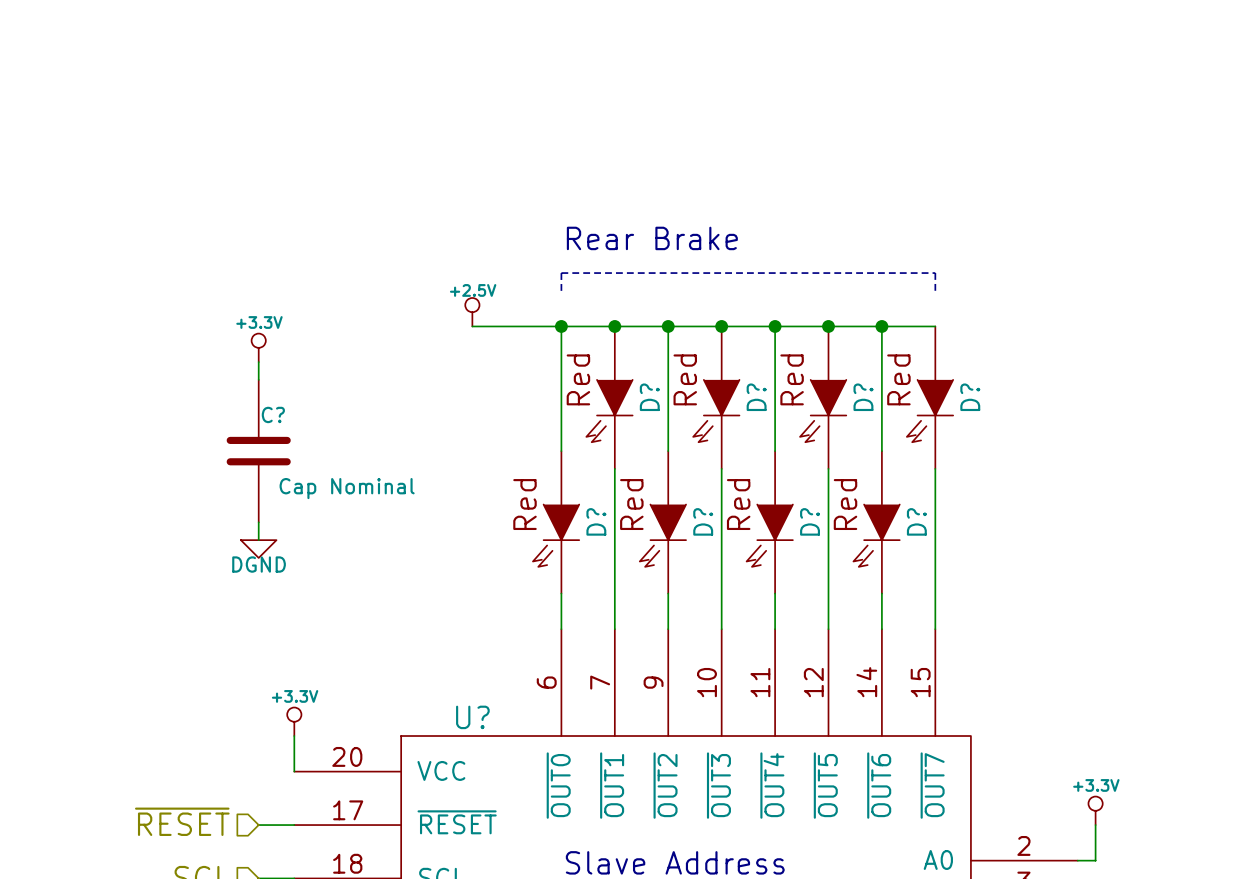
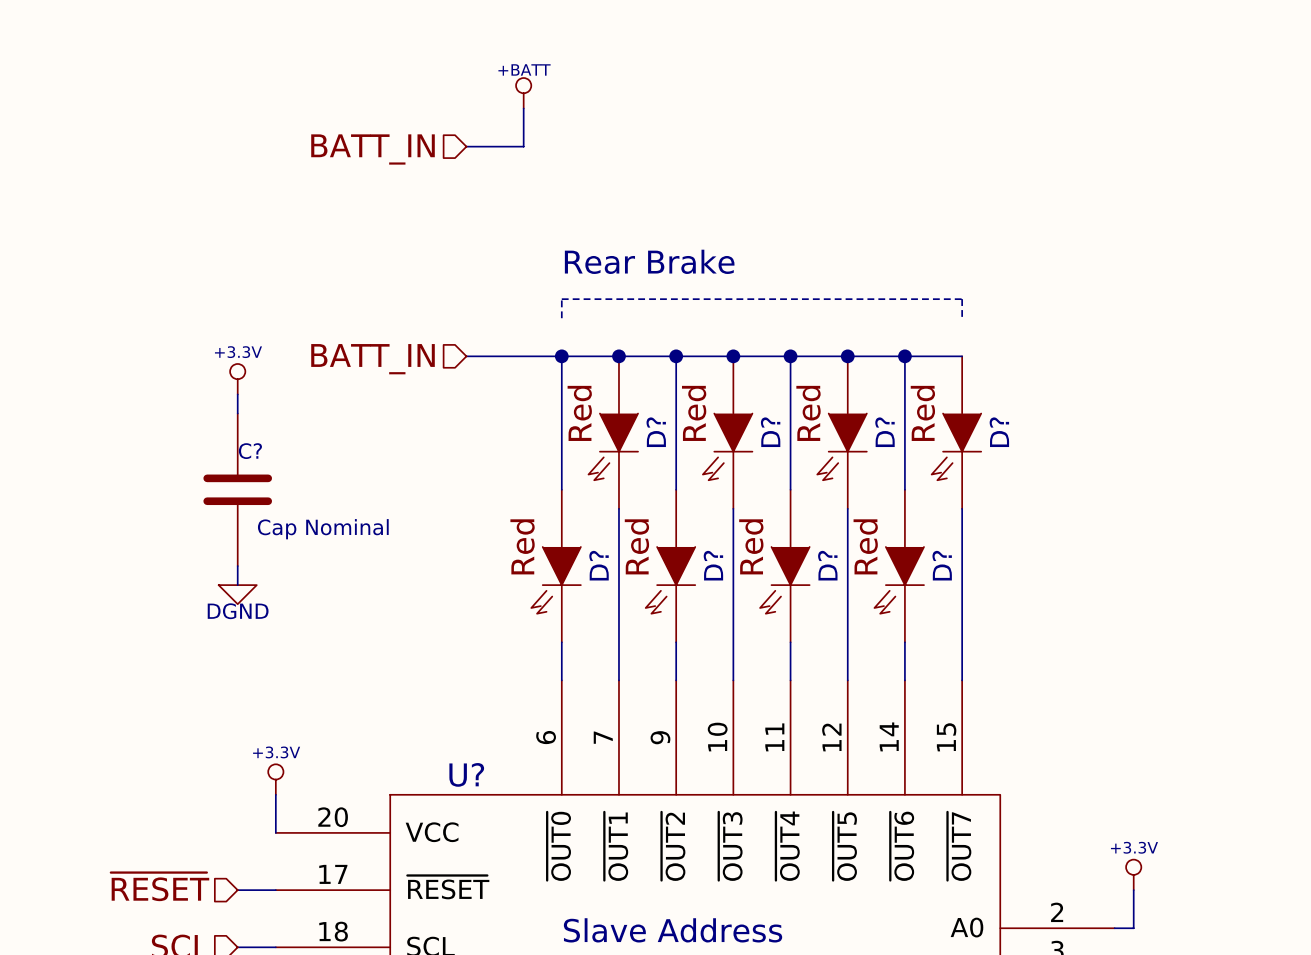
power symbol: none -> +BATT (523, 93)
wire: none -> (523, 108) (523, 146) (466, 146)
hierarchical label: none -> BATT_IN (373, 149)
power symbol: +2.5V (472, 312) -> none
hierarchical label: none -> BATT_IN (373, 359)

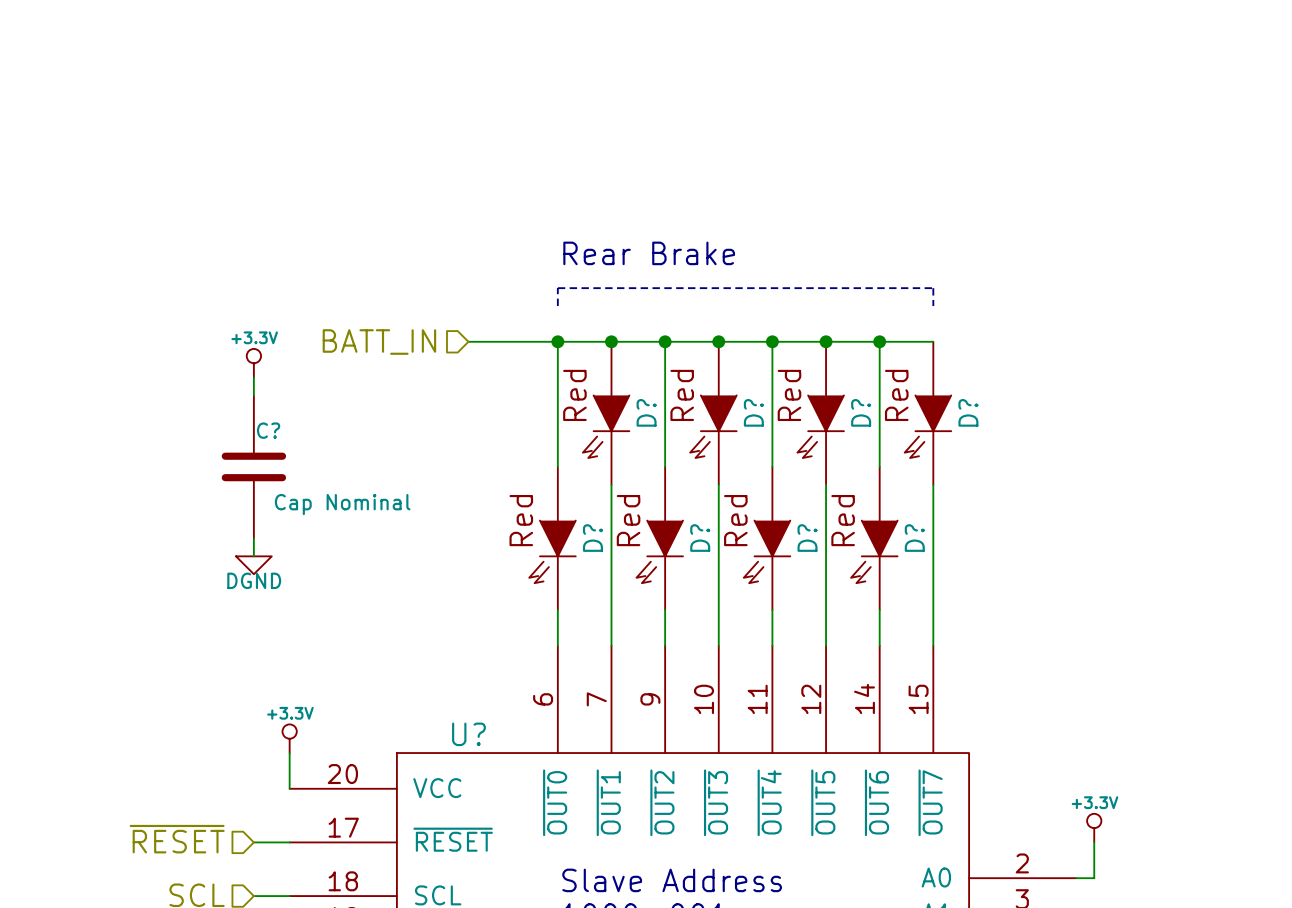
power symbol: +BATT (523, 93) -> none
wire: (523, 108) (523, 146) (466, 146) -> none
hierarchical label: BATT_IN (373, 149) -> none

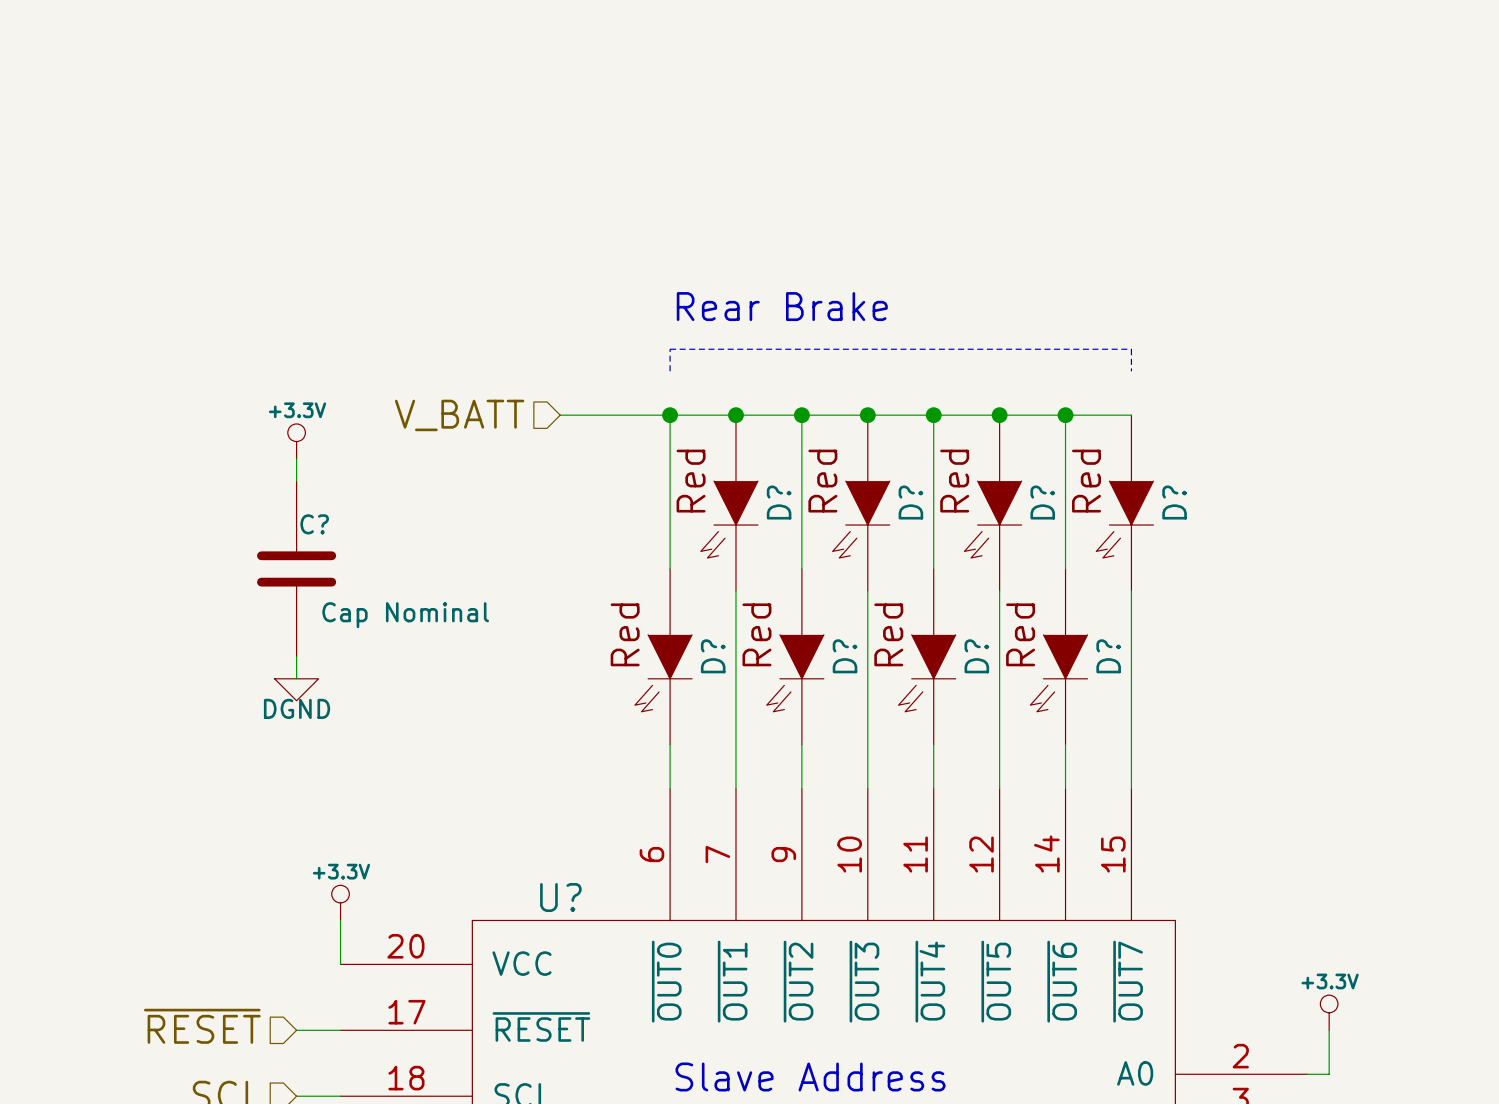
hierarchical label: BATT_IN (379, 342) -> V_BATT (459, 415)

